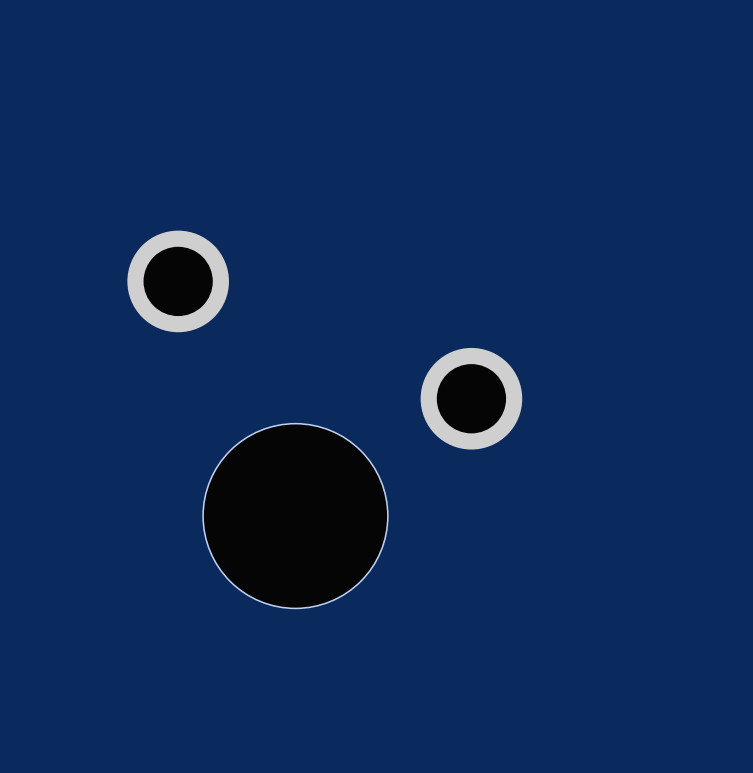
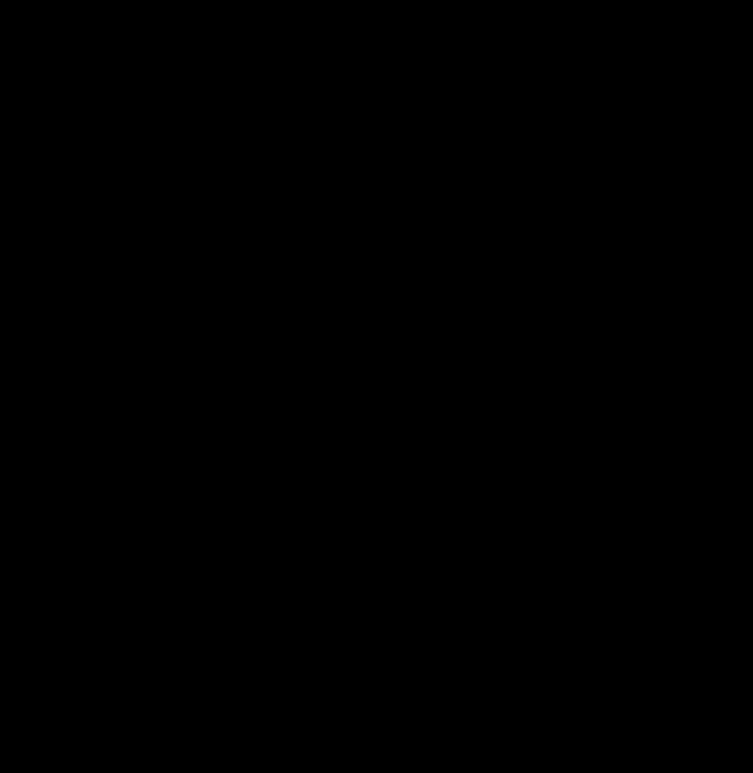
part: (324, 419) -> none

